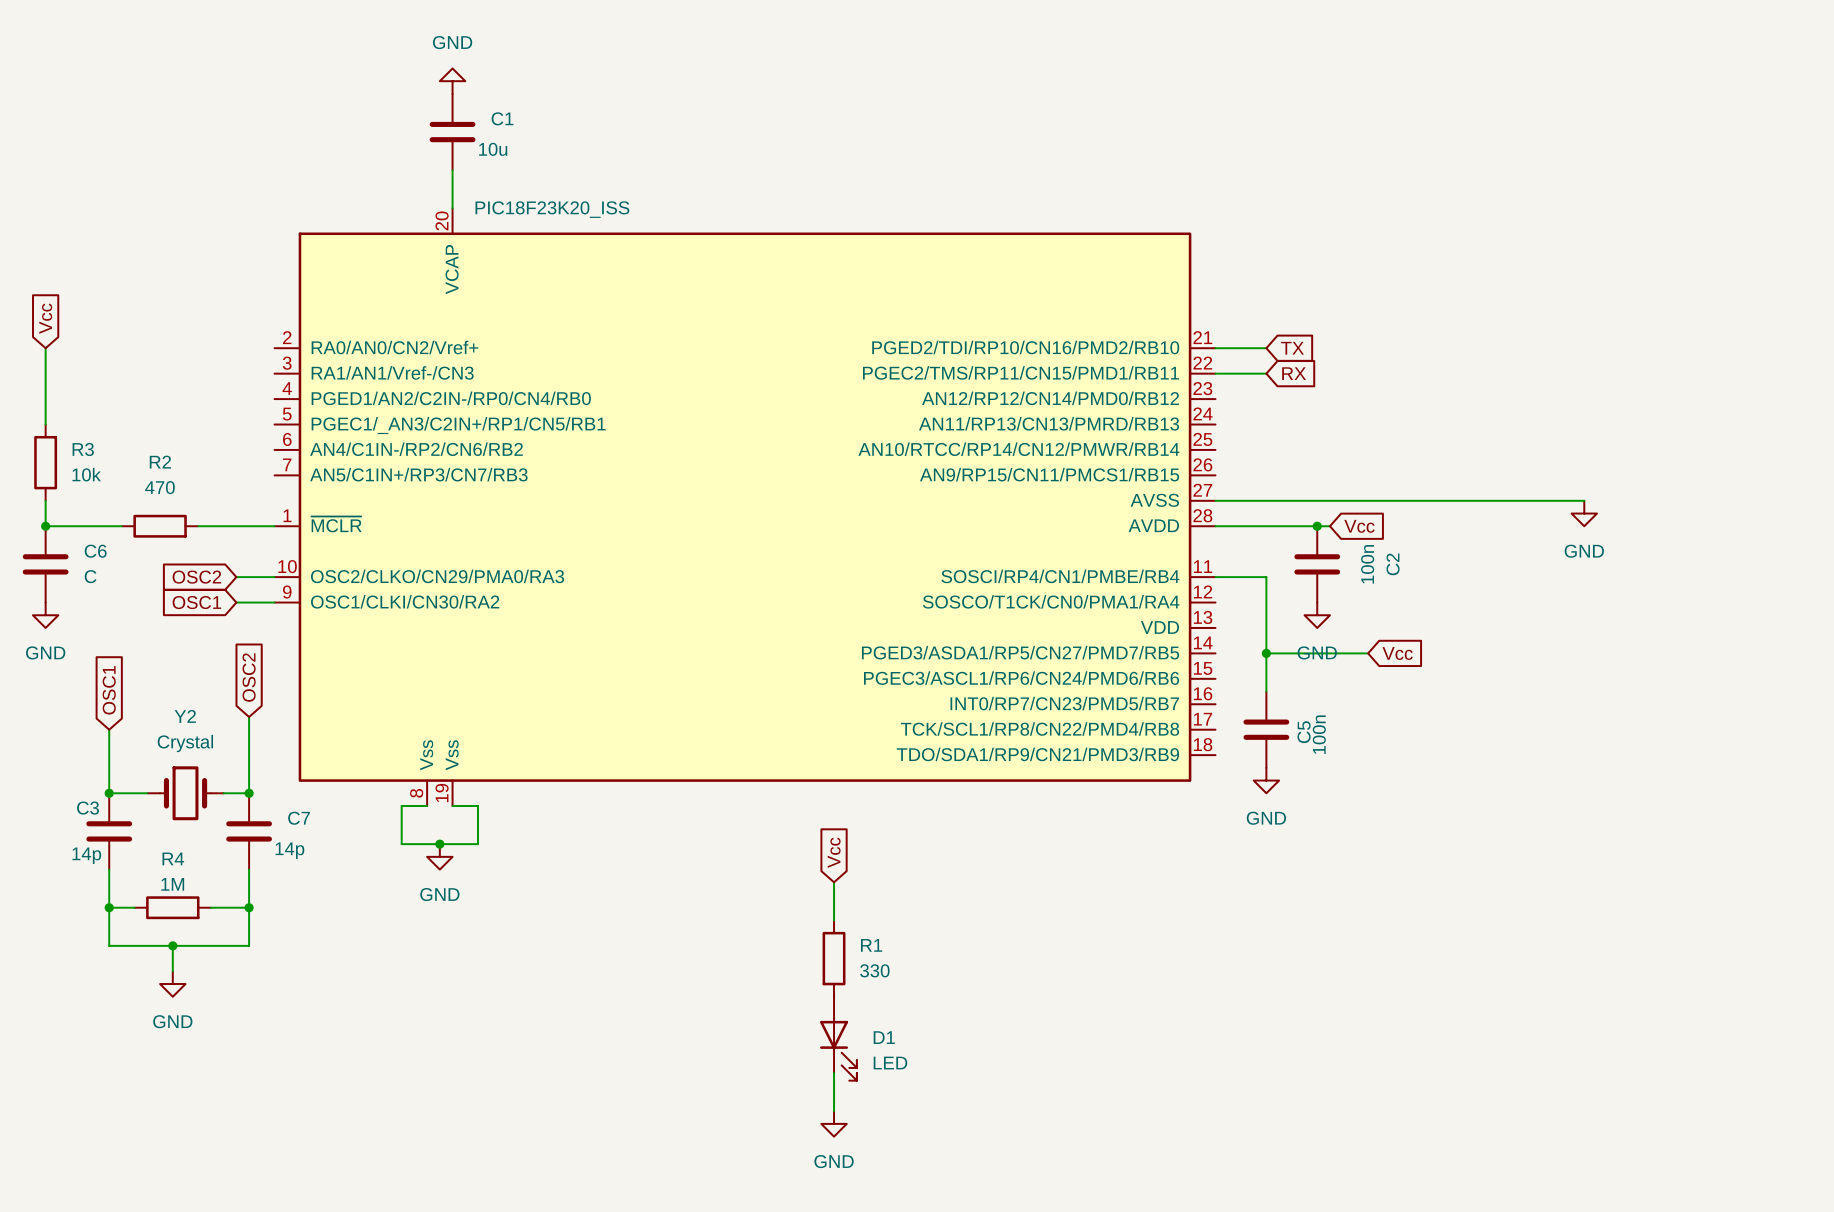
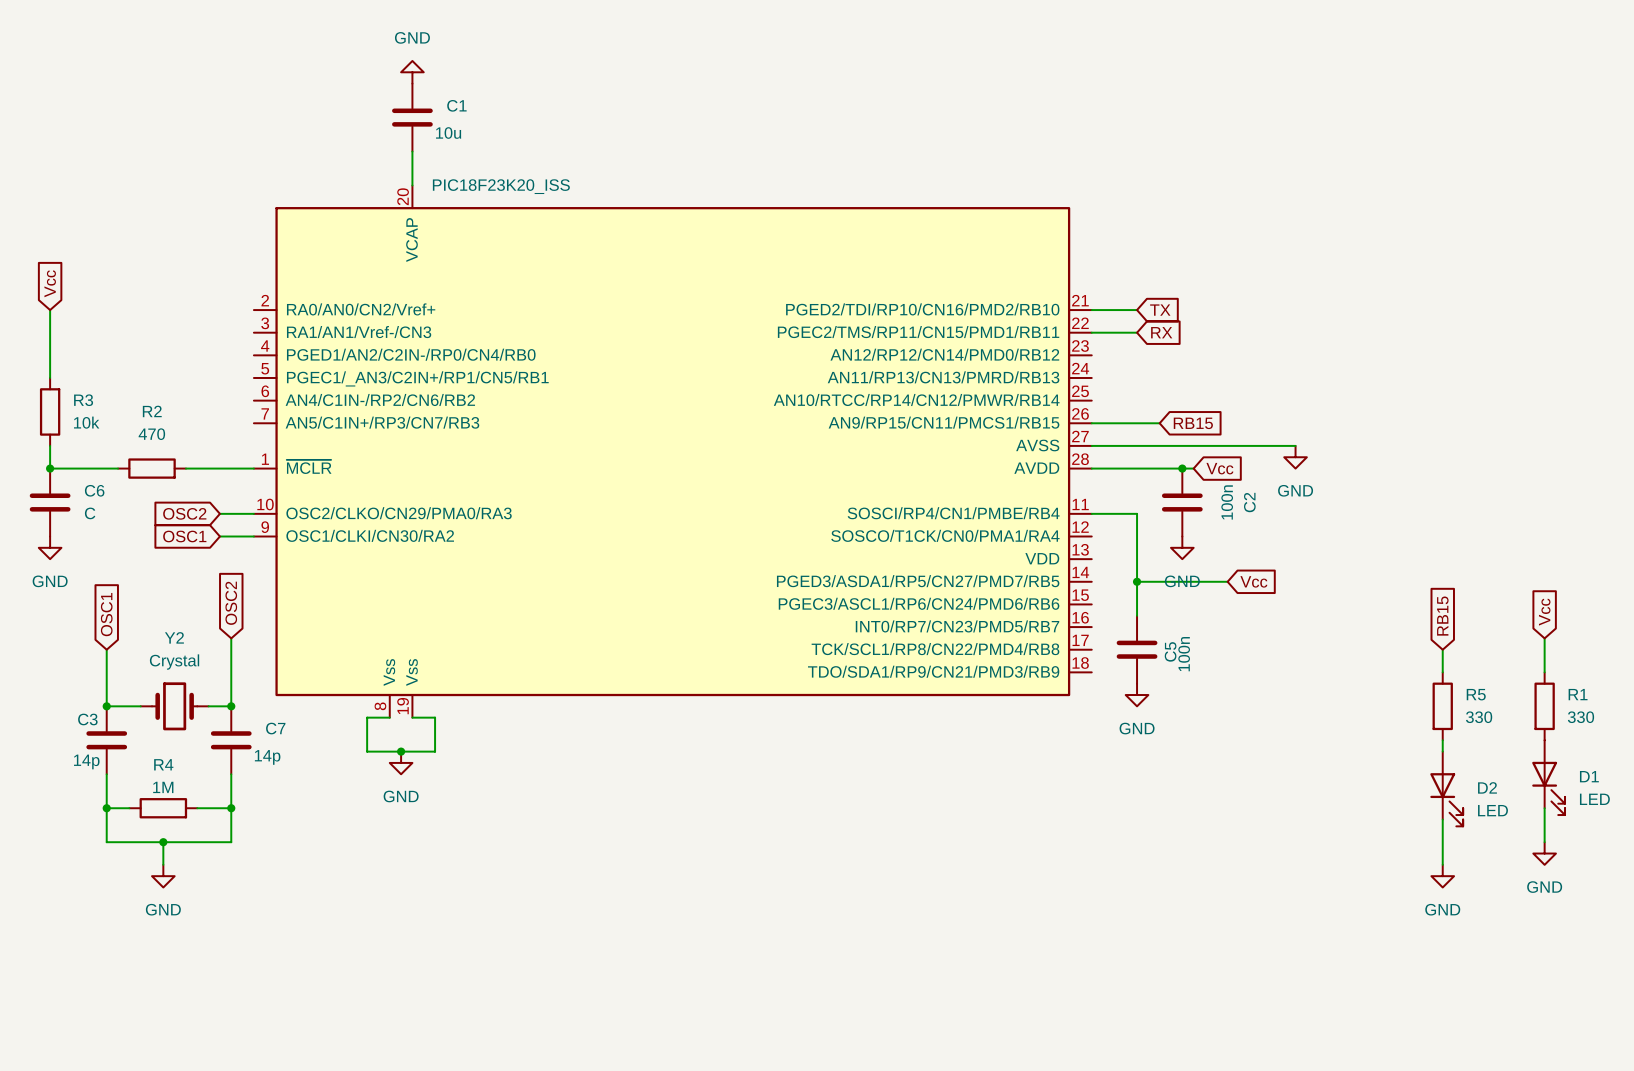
wire: none -> (1091, 423) (1159, 423)
global label: none -> RB15 (1193, 423)
wire: (1444, 500) (1584, 500) -> none
power symbol position: GND (1584, 513) -> GND (1295, 457)
global label: none -> Vcc (1544, 612)
global label: none -> RB15 (1442, 616)
wire: none -> (1544, 638) (1544, 672)
wire: none -> (1442, 649) (1442, 672)
R5: none -> 330 (1442, 706)
wire: none -> (1442, 740) (1442, 751)
global label: Vcc (834, 852) -> none
wire: (834, 882) (834, 920) -> none
D2: none -> LED (1446, 788)
wire: none -> (1544, 808) (1544, 842)
wire: none -> (1442, 819) (1442, 864)
R1 position: (834, 958) -> (1544, 706)
power symbol: none -> GND (1544, 853)
power symbol: none -> GND (1442, 876)
D1 position: (838, 1038) -> (1548, 777)
wire: (834, 1073) (834, 1111) -> none
power symbol: GND (834, 1123) -> none

